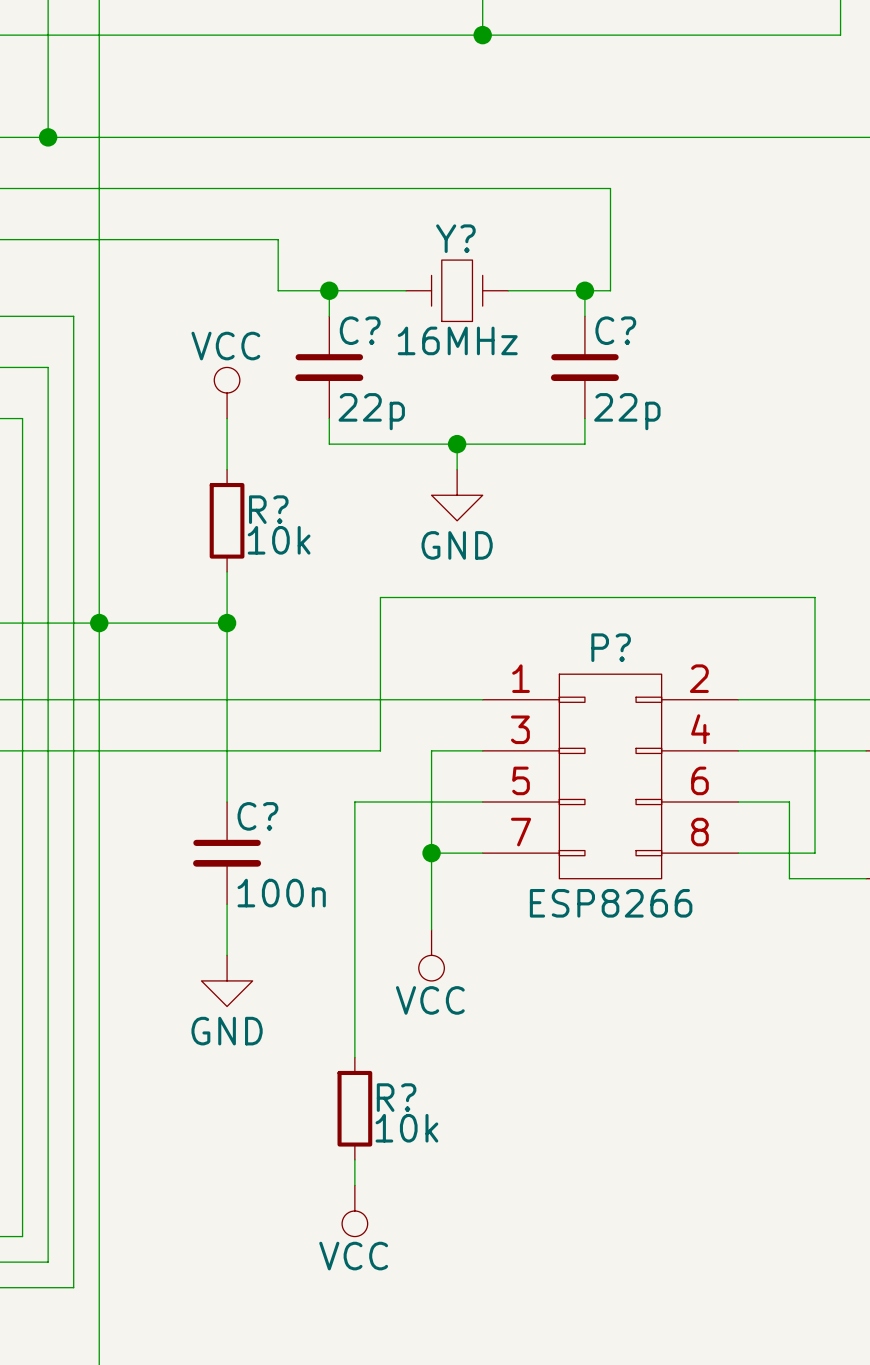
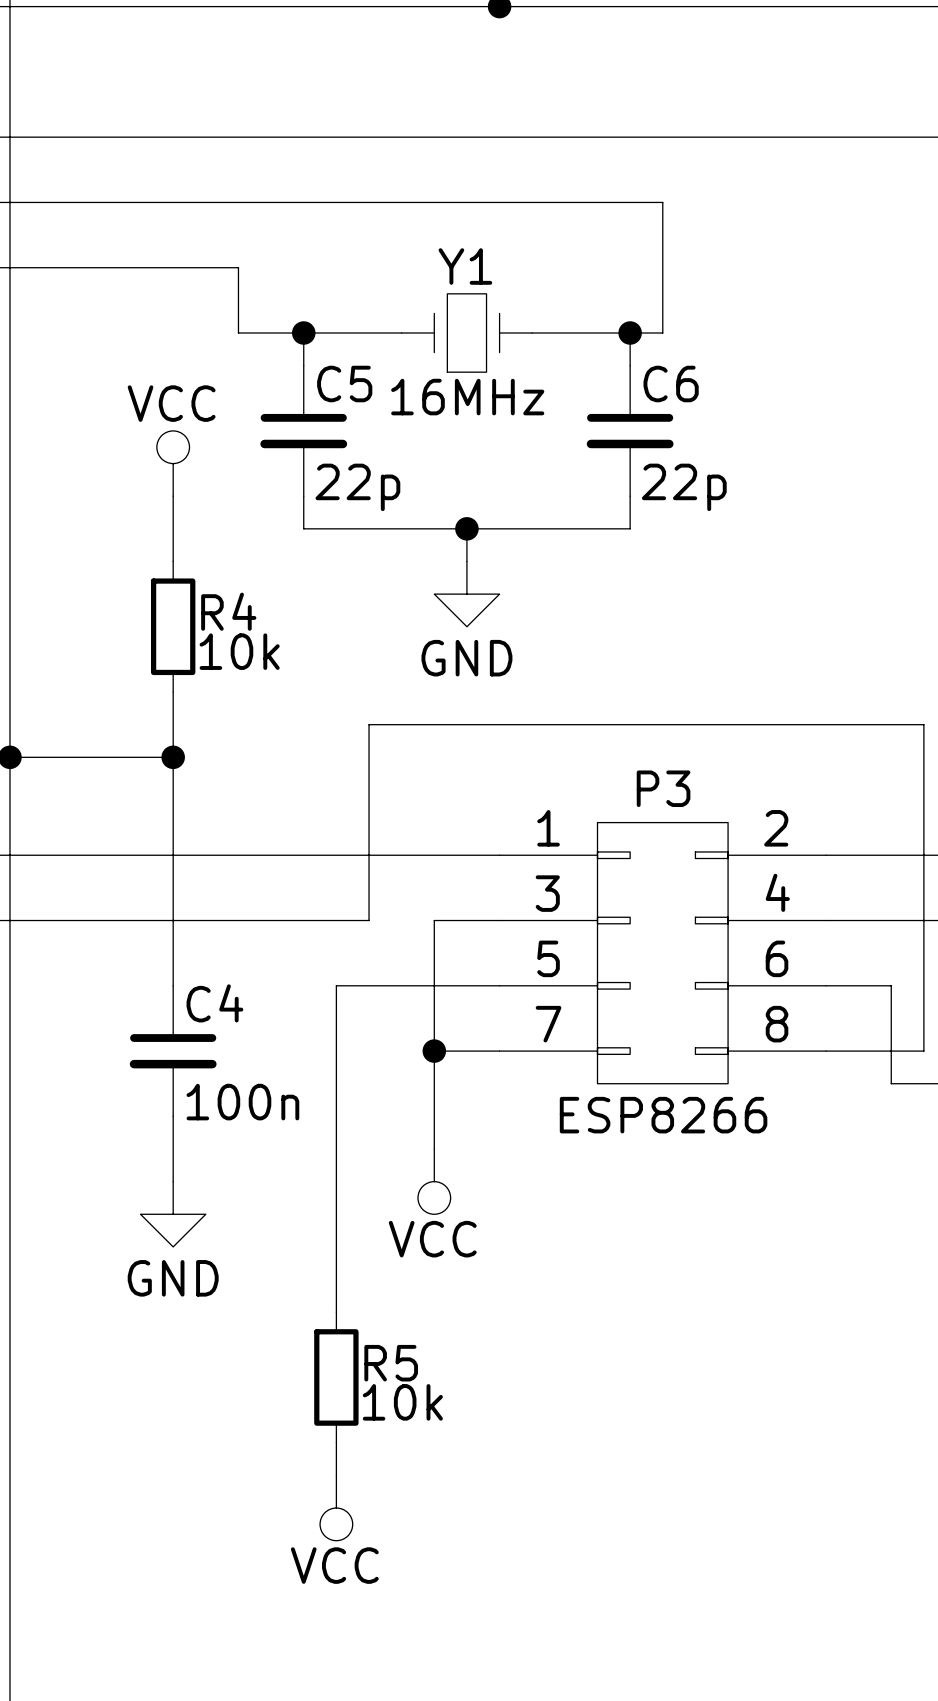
Y? name: Y? (455, 238) -> Y1 (465, 266)
C? name: C? (360, 330) -> C5 (344, 384)
C? name: C? (615, 330) -> C6 (671, 384)
R? name: R? (268, 509) -> R4 (228, 611)
P? name: P? (611, 647) -> P3 (663, 788)
C? name: C? (257, 816) -> C4 (214, 1003)
R? name: R? (396, 1097) -> R5 (391, 1363)

